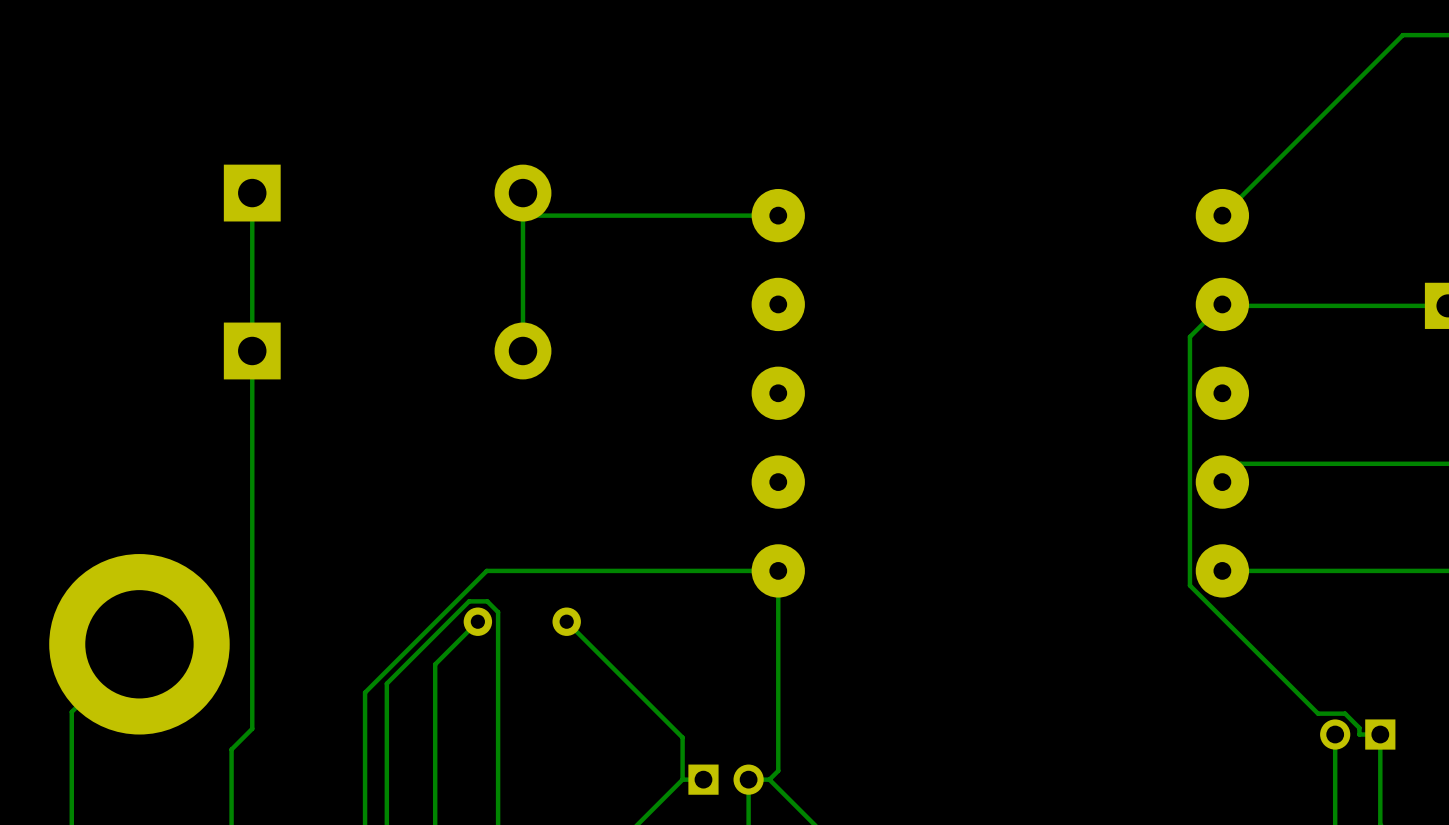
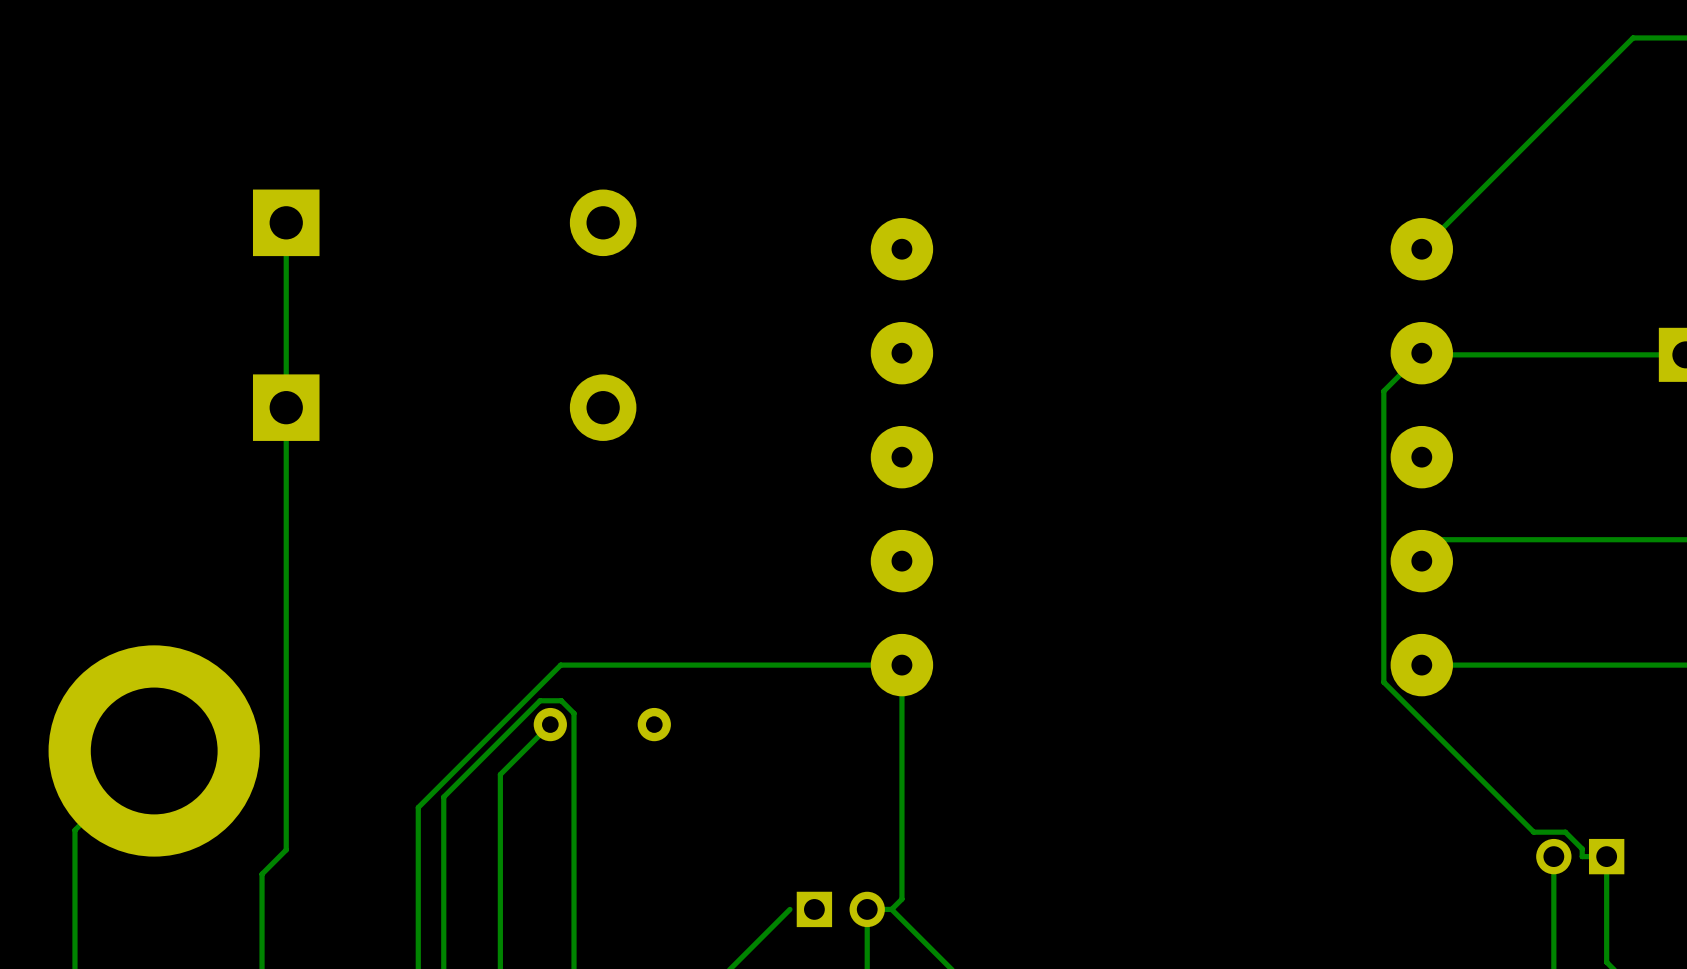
track: (522, 193) (522, 350) -> none
track: (778, 215) (522, 215) -> none
track: (566, 621) (682, 737) (682, 779) (703, 779) -> none

